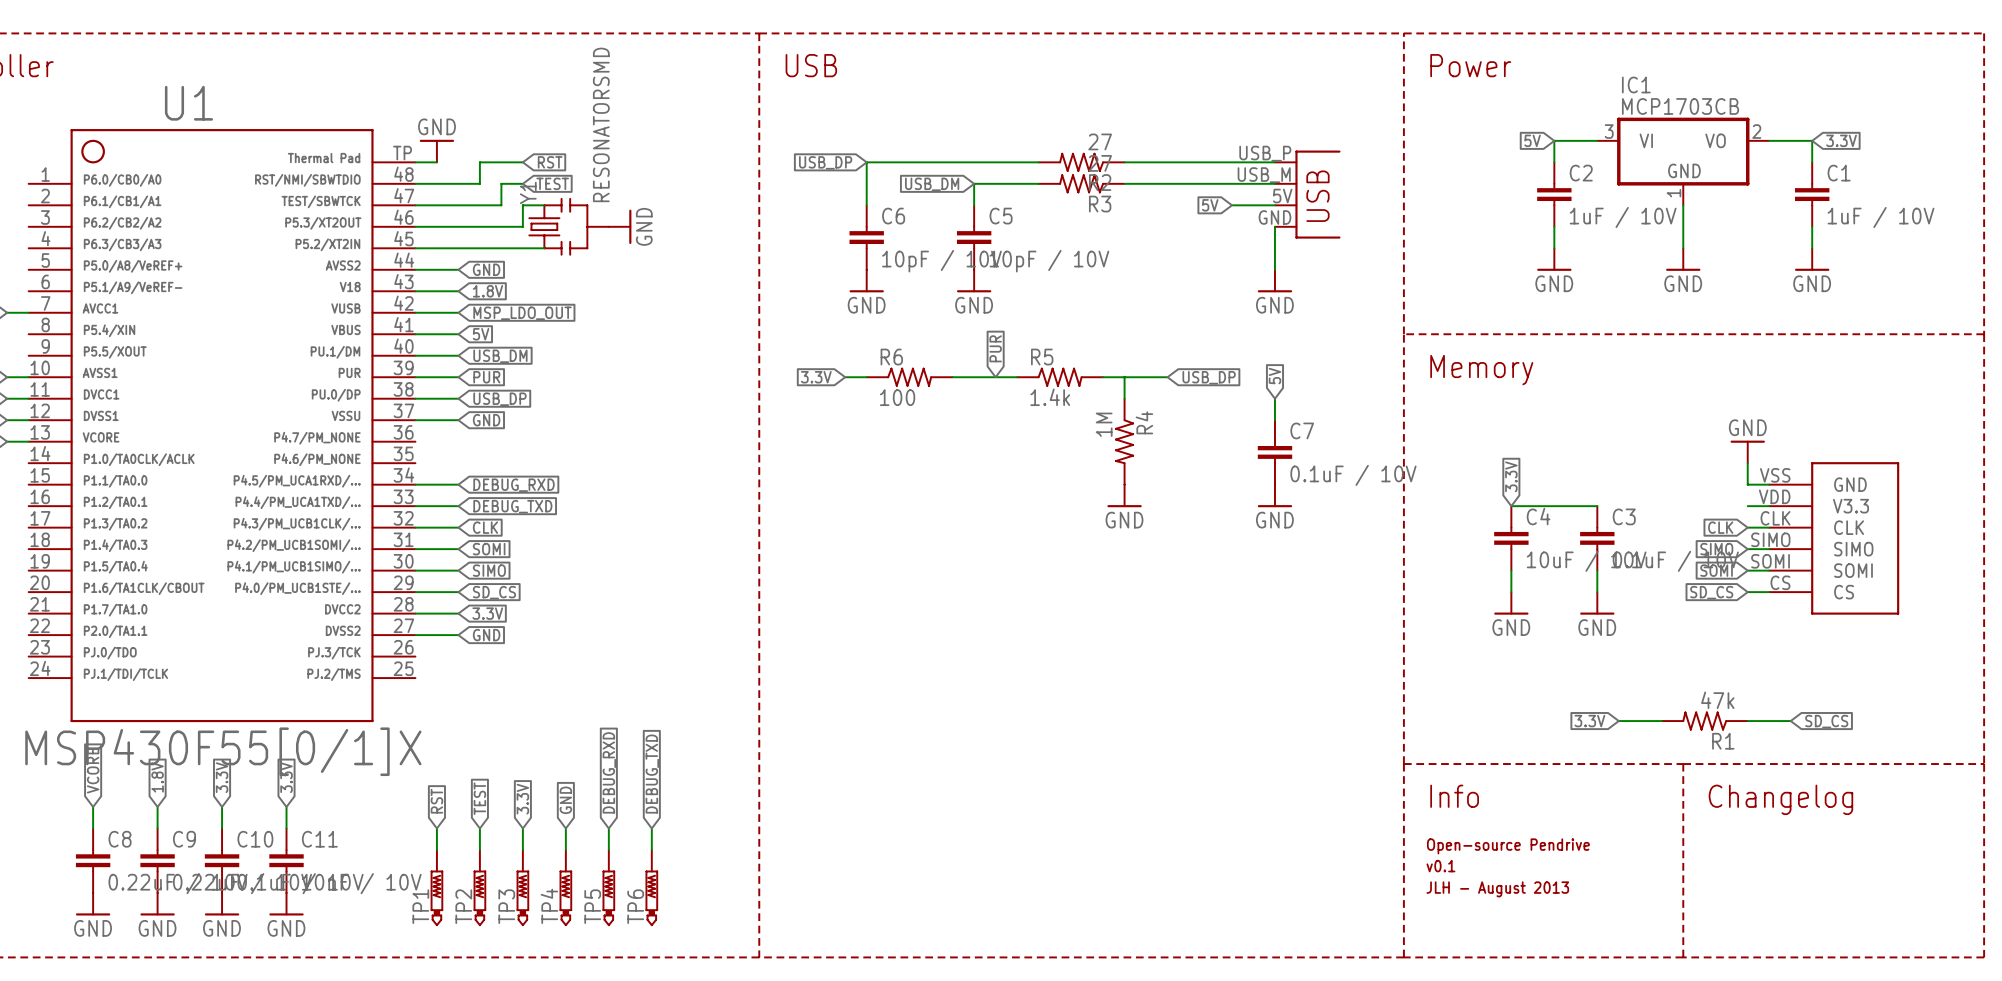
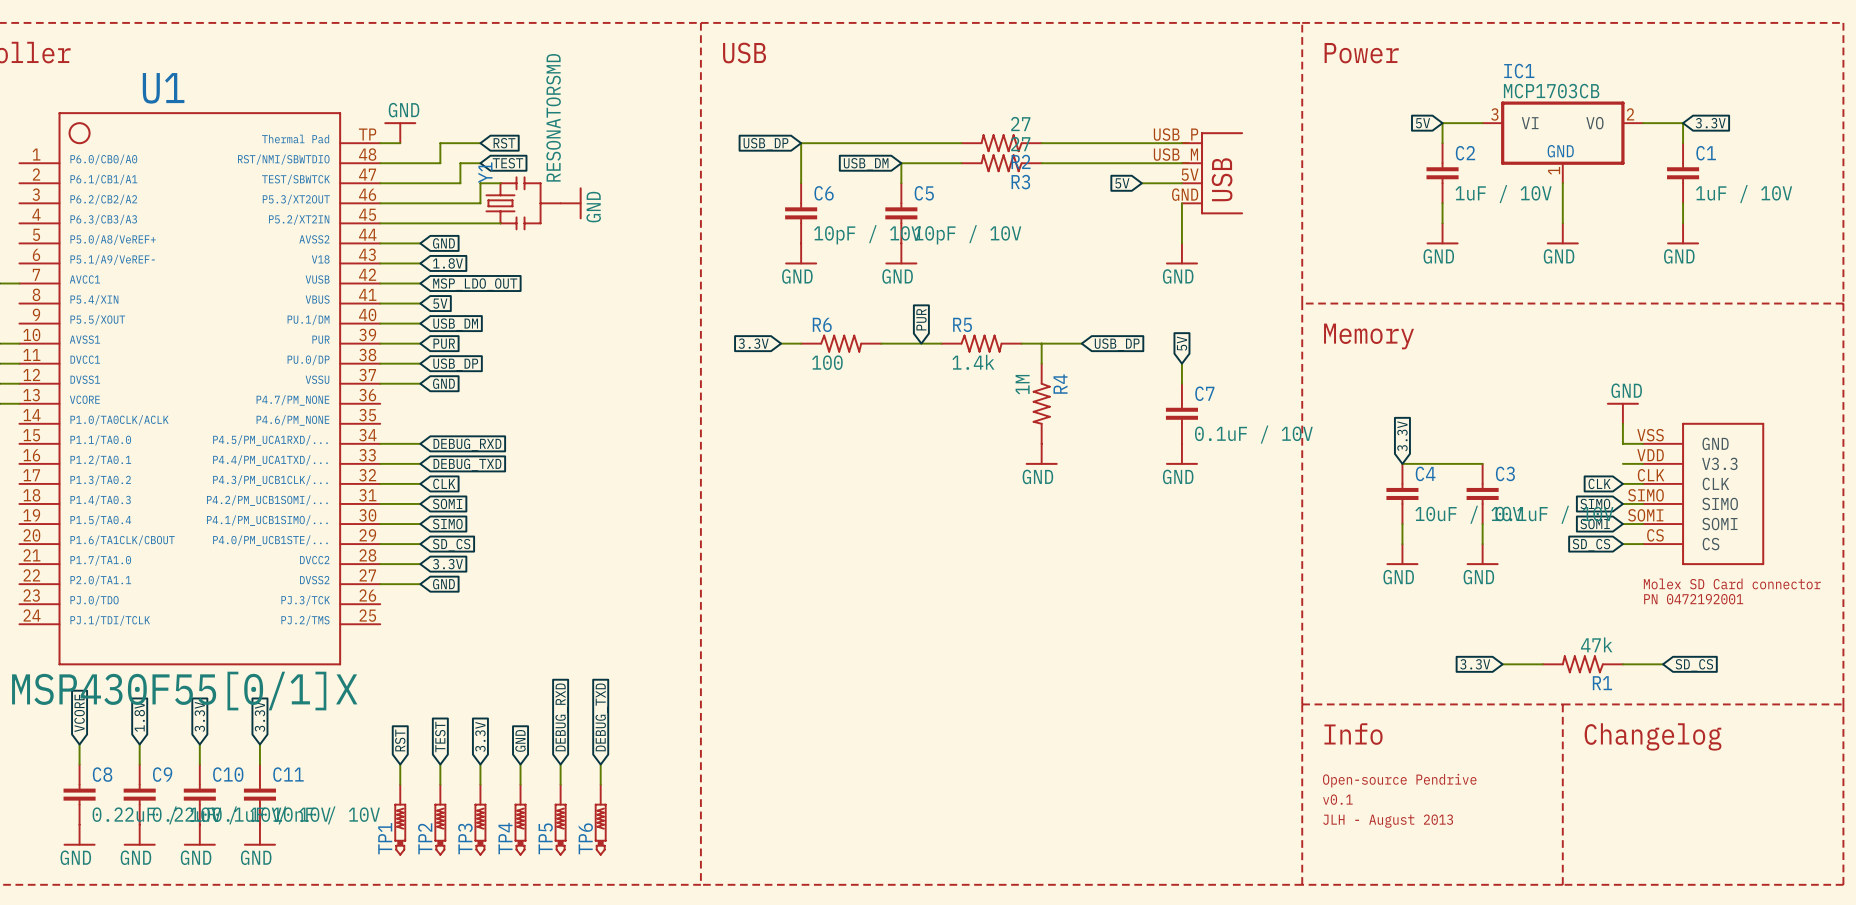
text: none -> Molex SD Card connector (1732, 583)
text: none -> PN 0472192001 (1693, 599)

